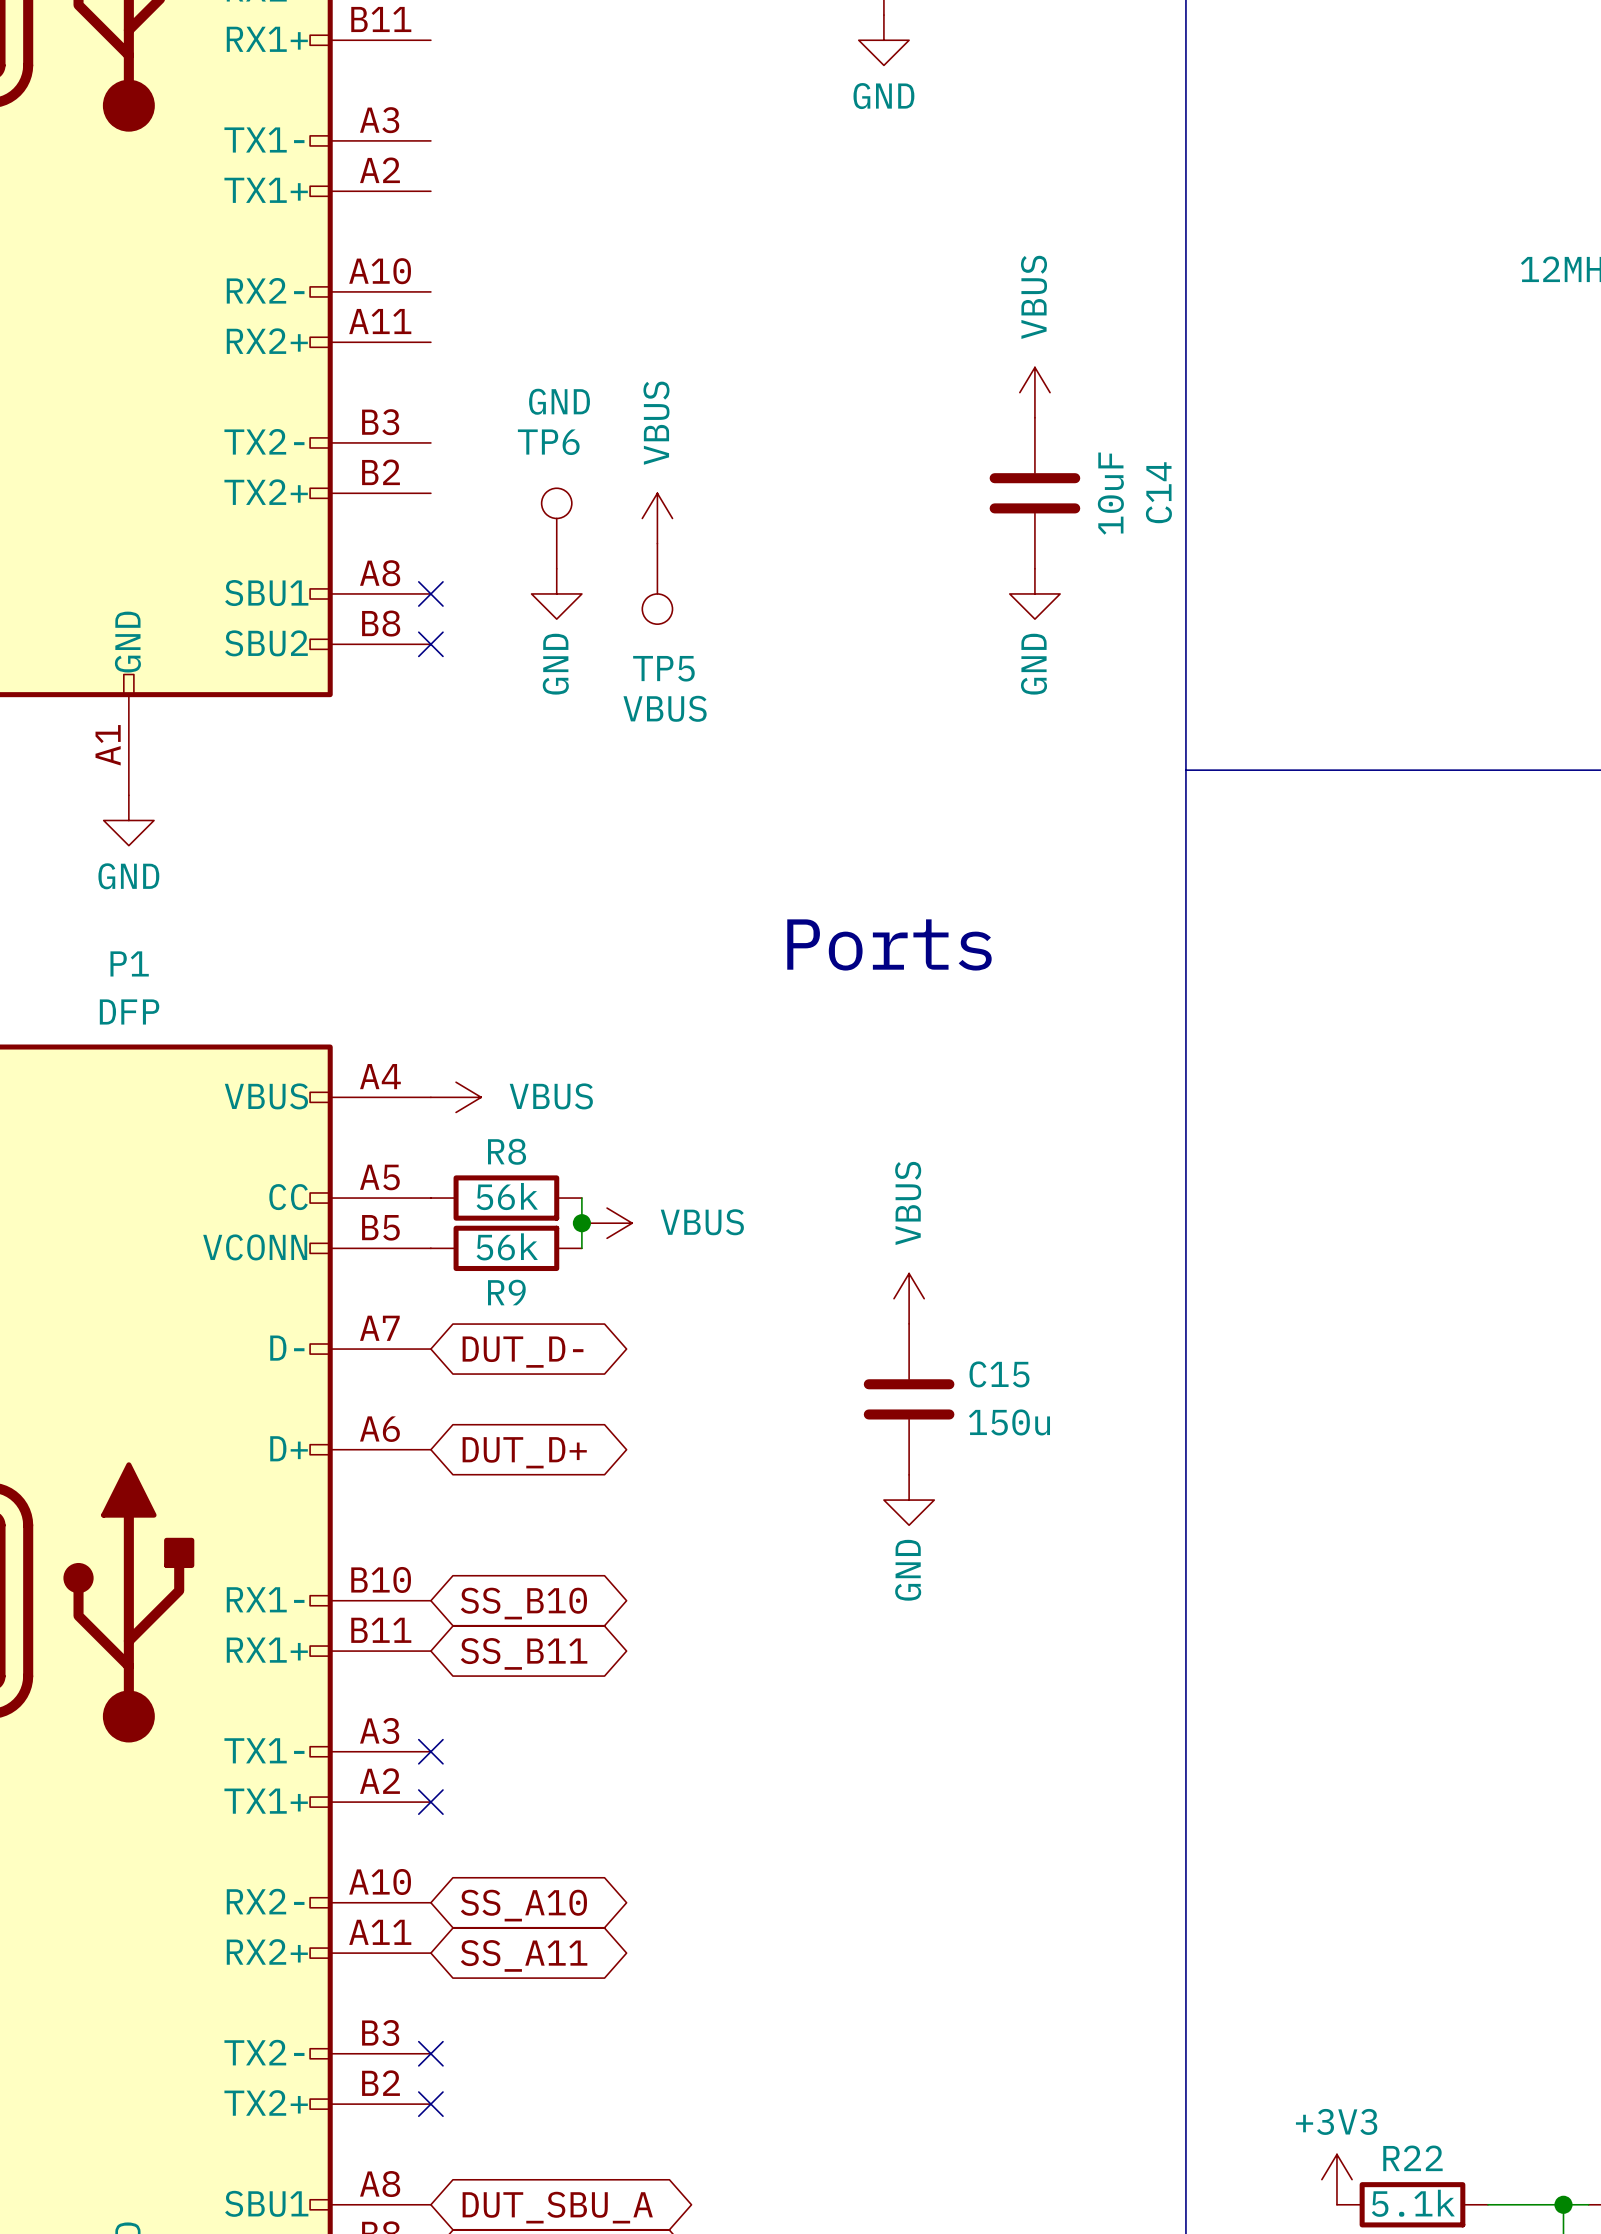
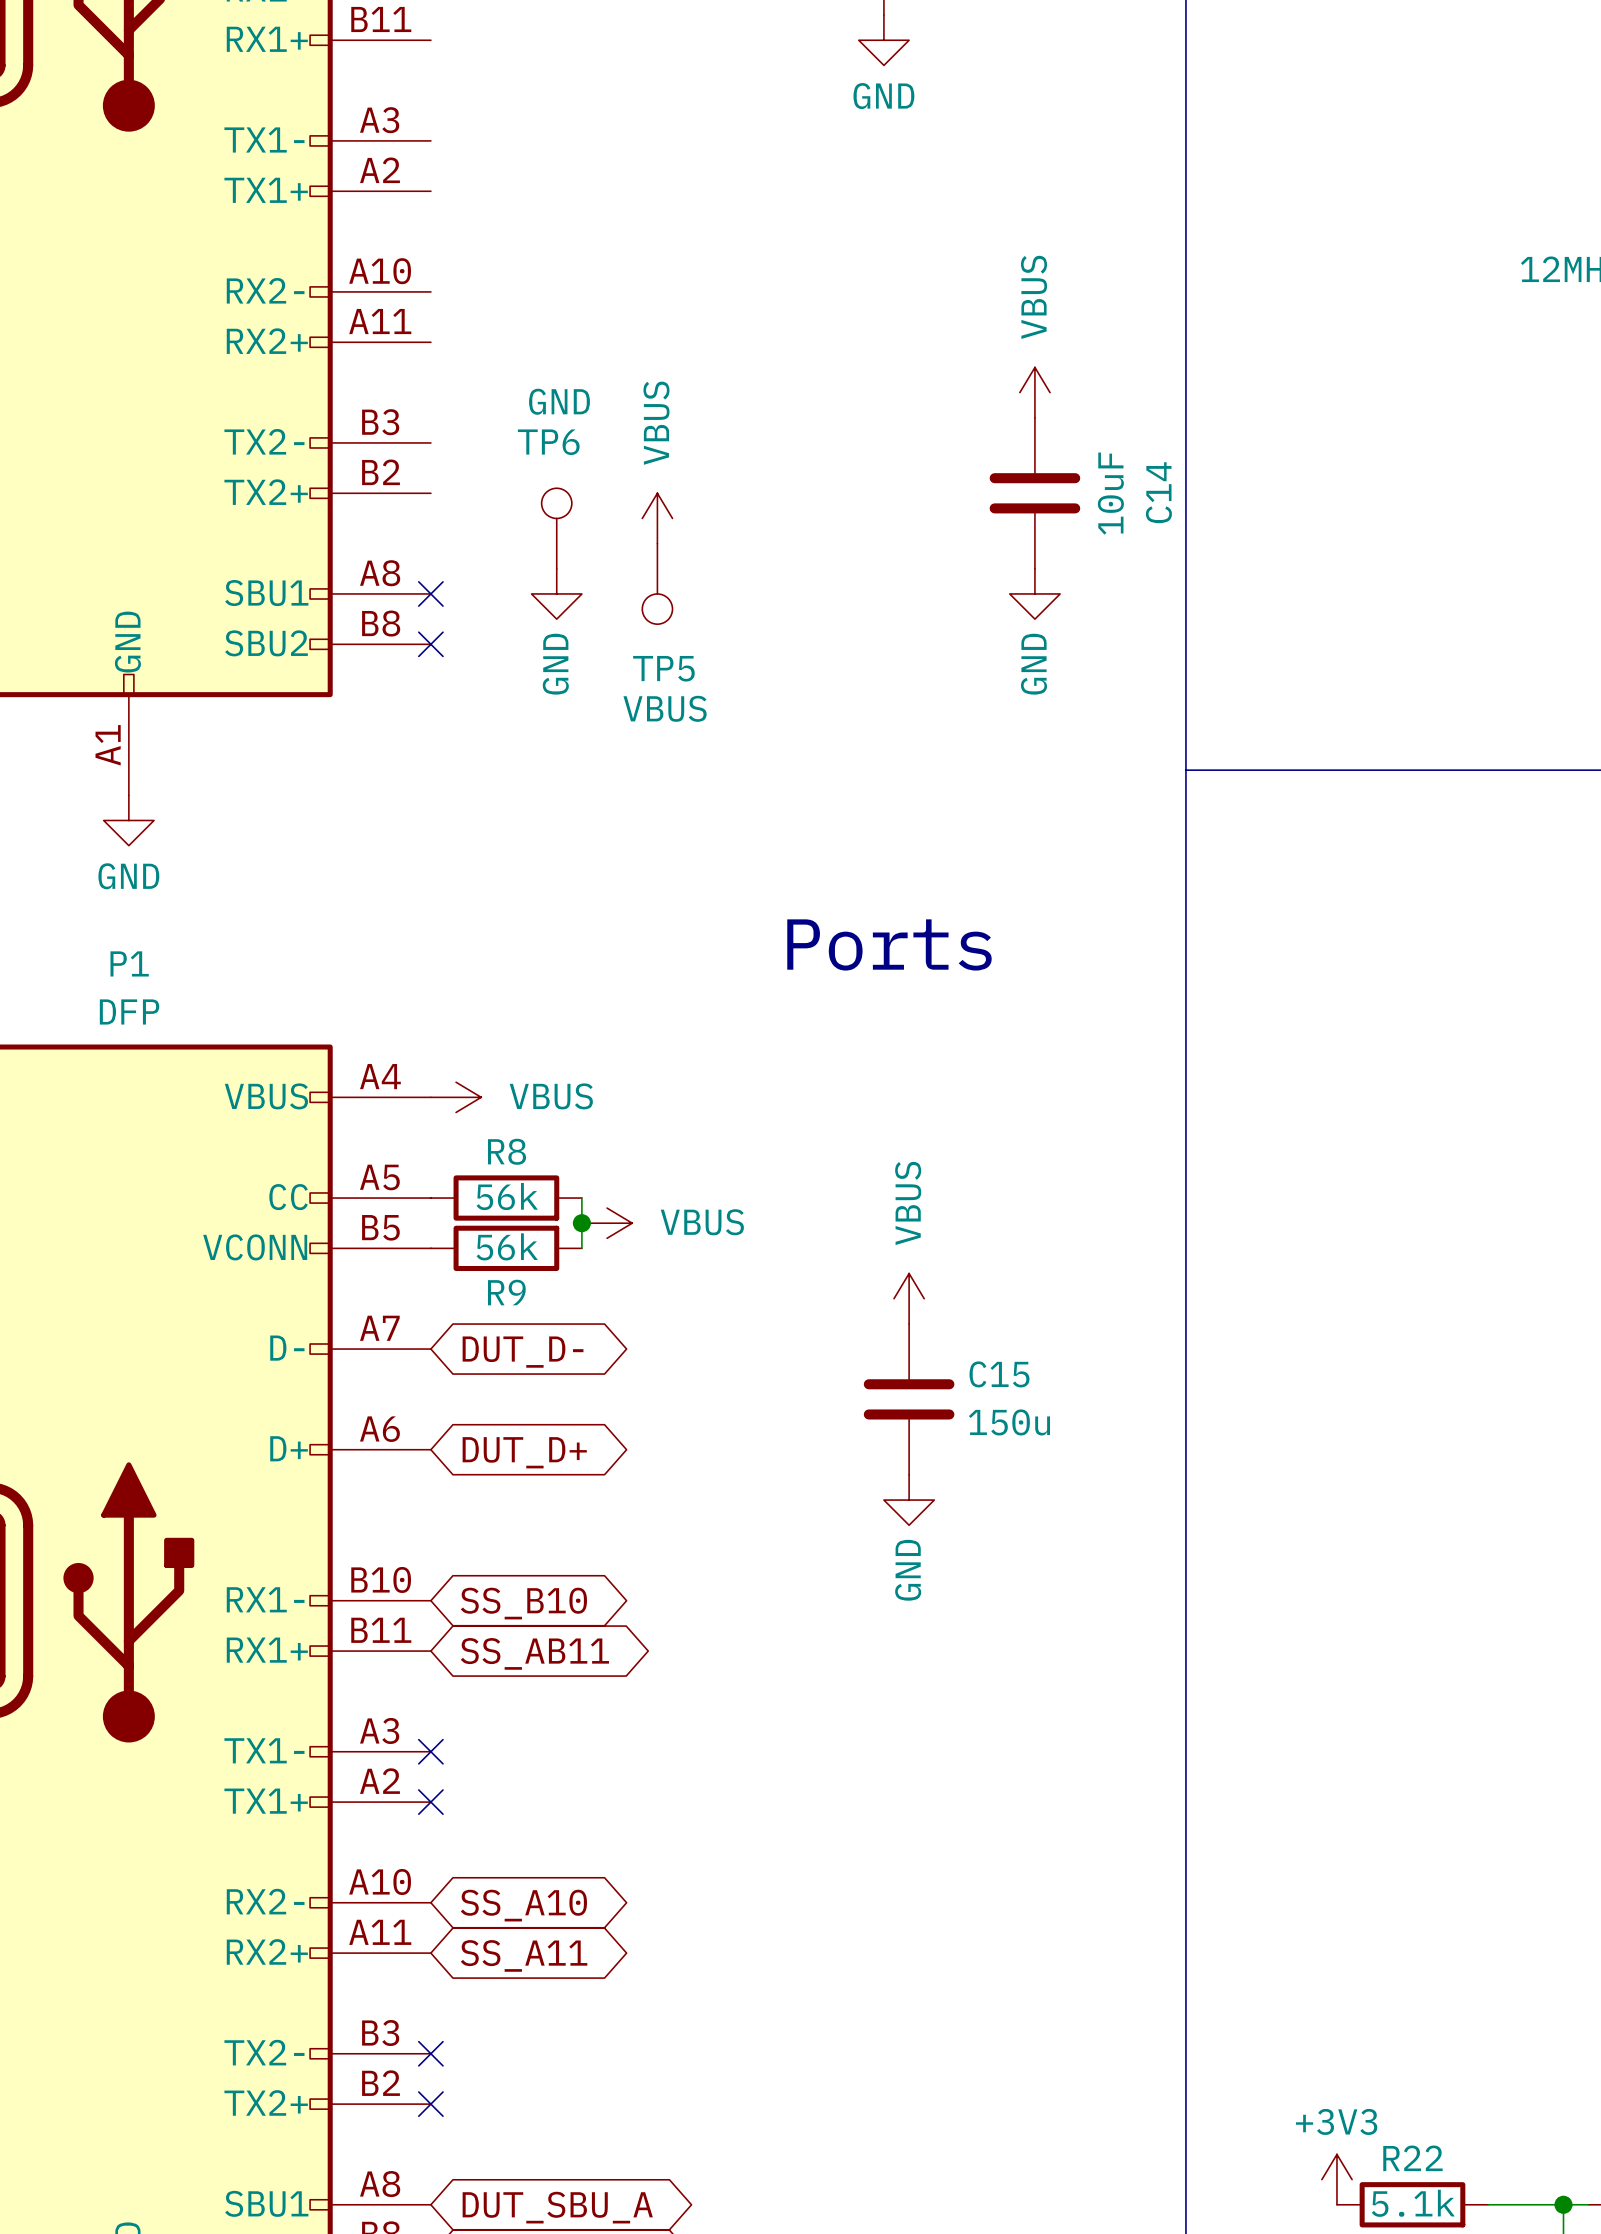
global label: SS_B11 (524, 1653) -> SS_AB11 (534, 1653)

